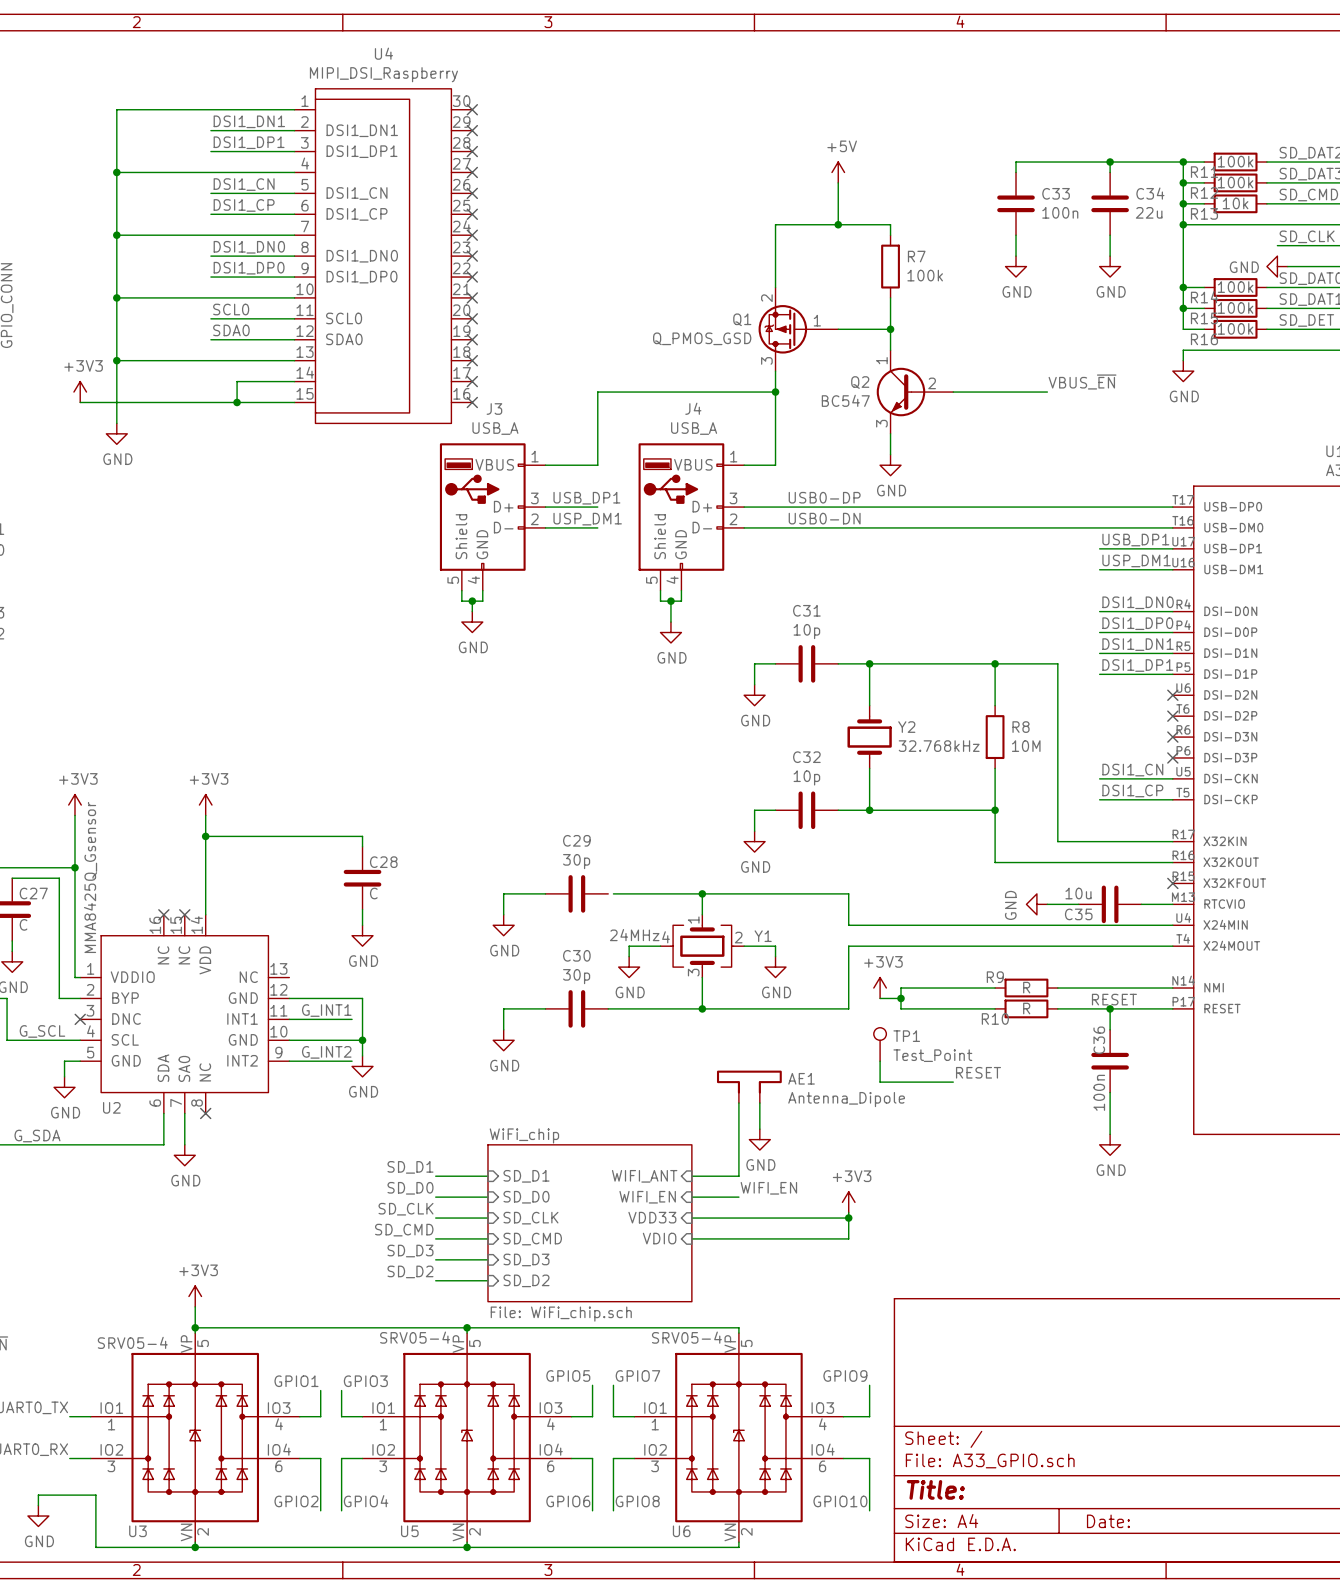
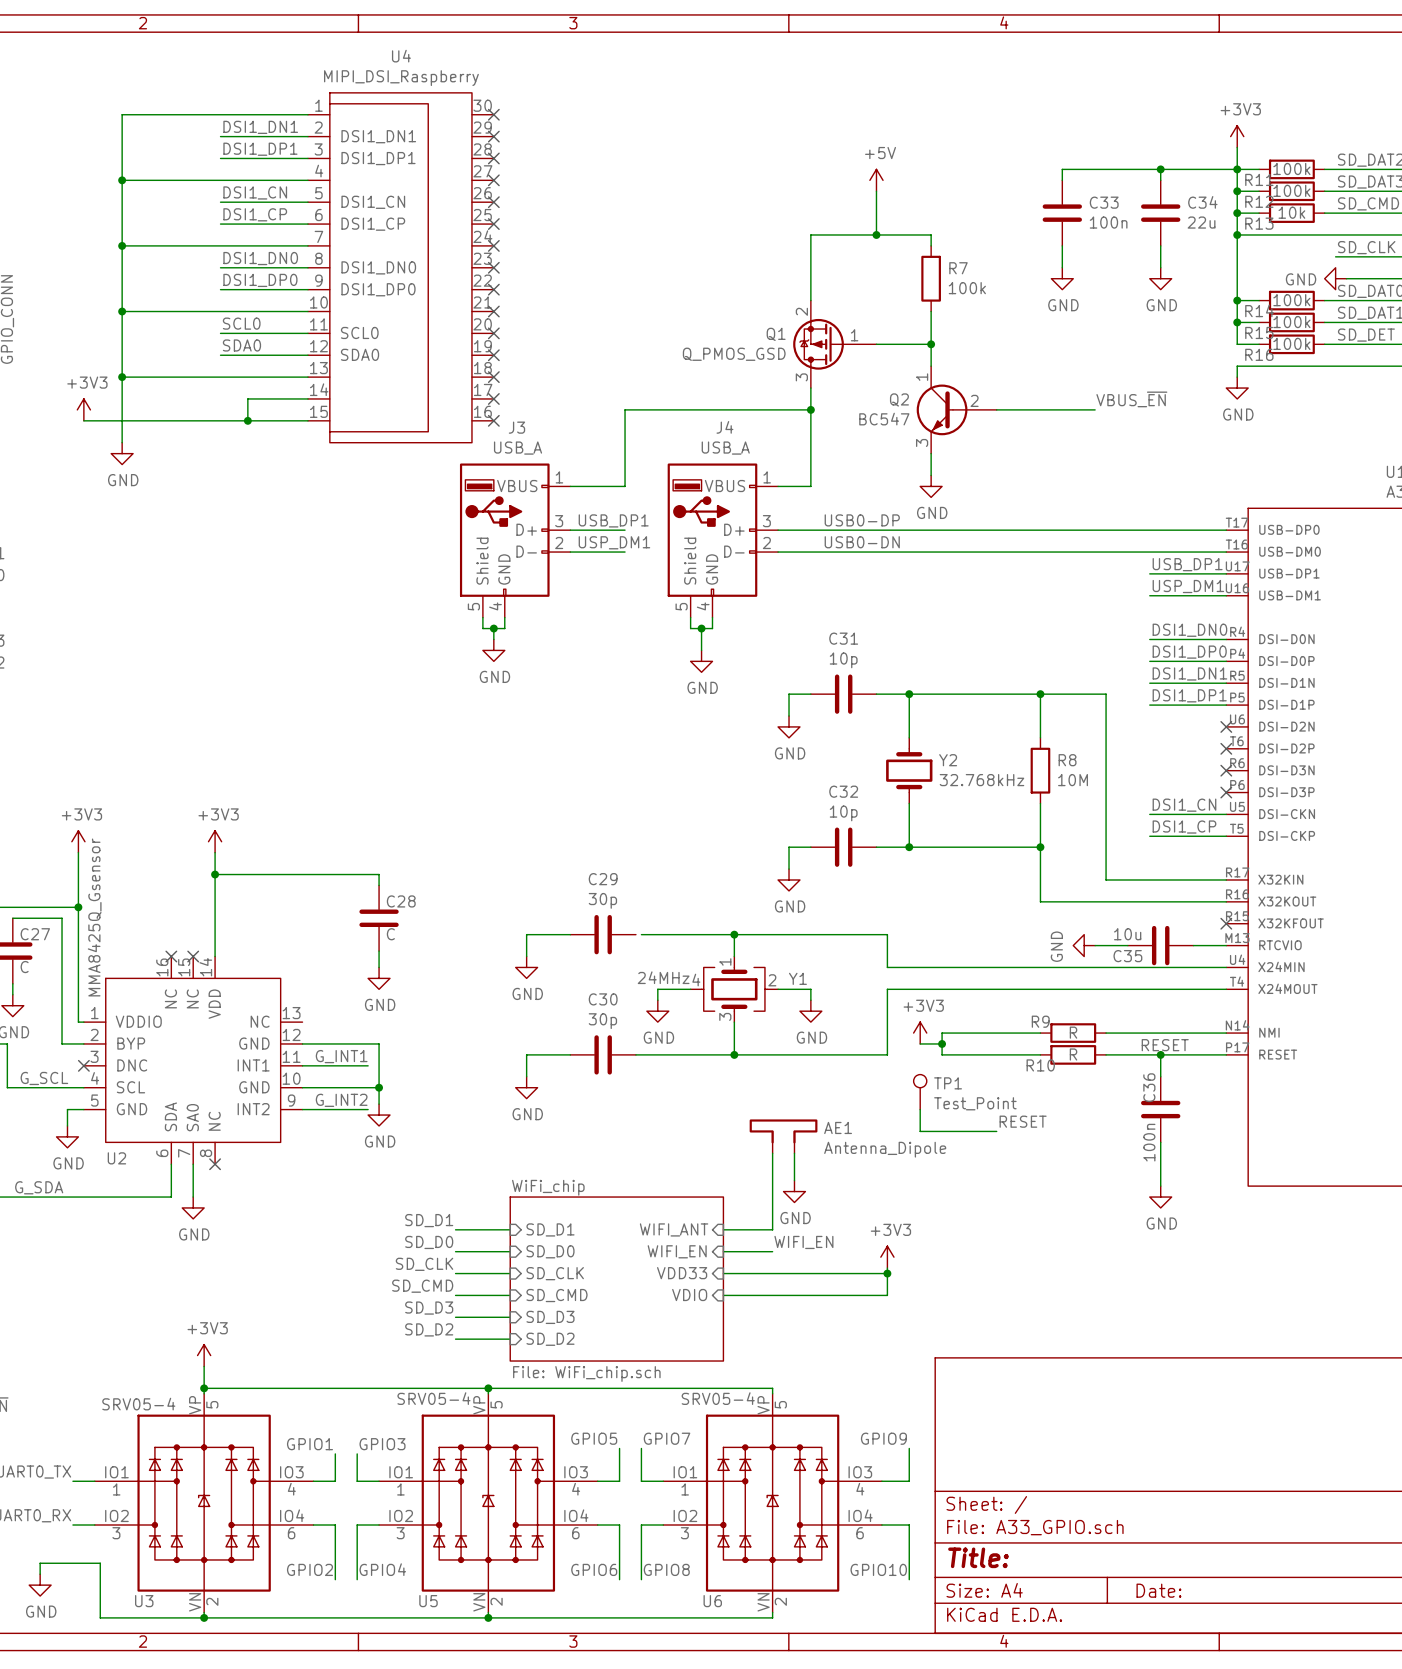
power symbol: none -> +3V3 (1237, 136)
wire: none -> (1237, 147) (1237, 169)

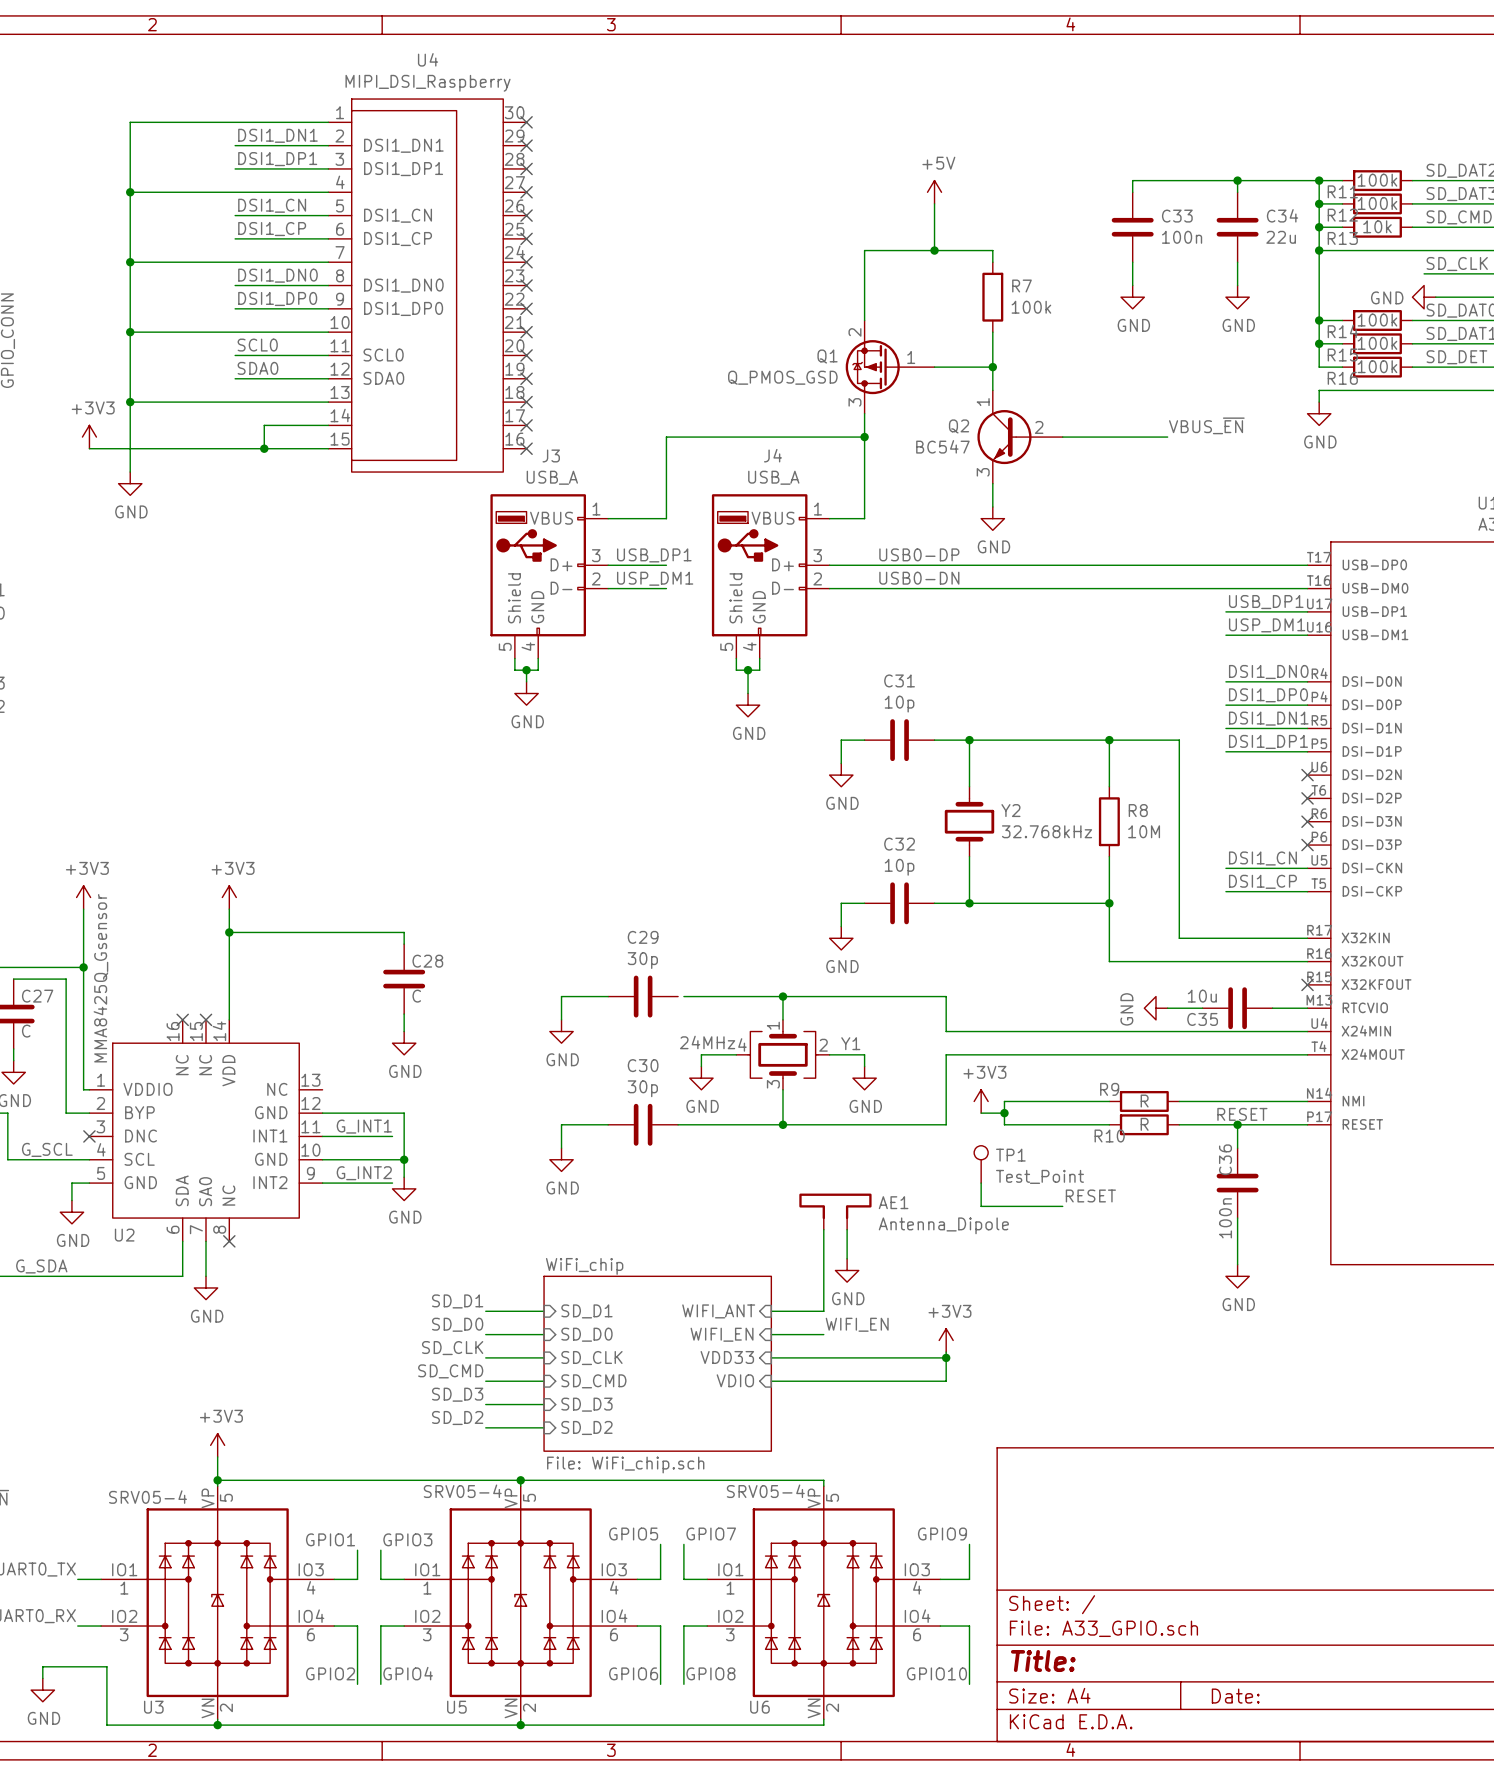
power symbol: +3V3 (1237, 136) -> none
wire: (1237, 147) (1237, 169) -> none

